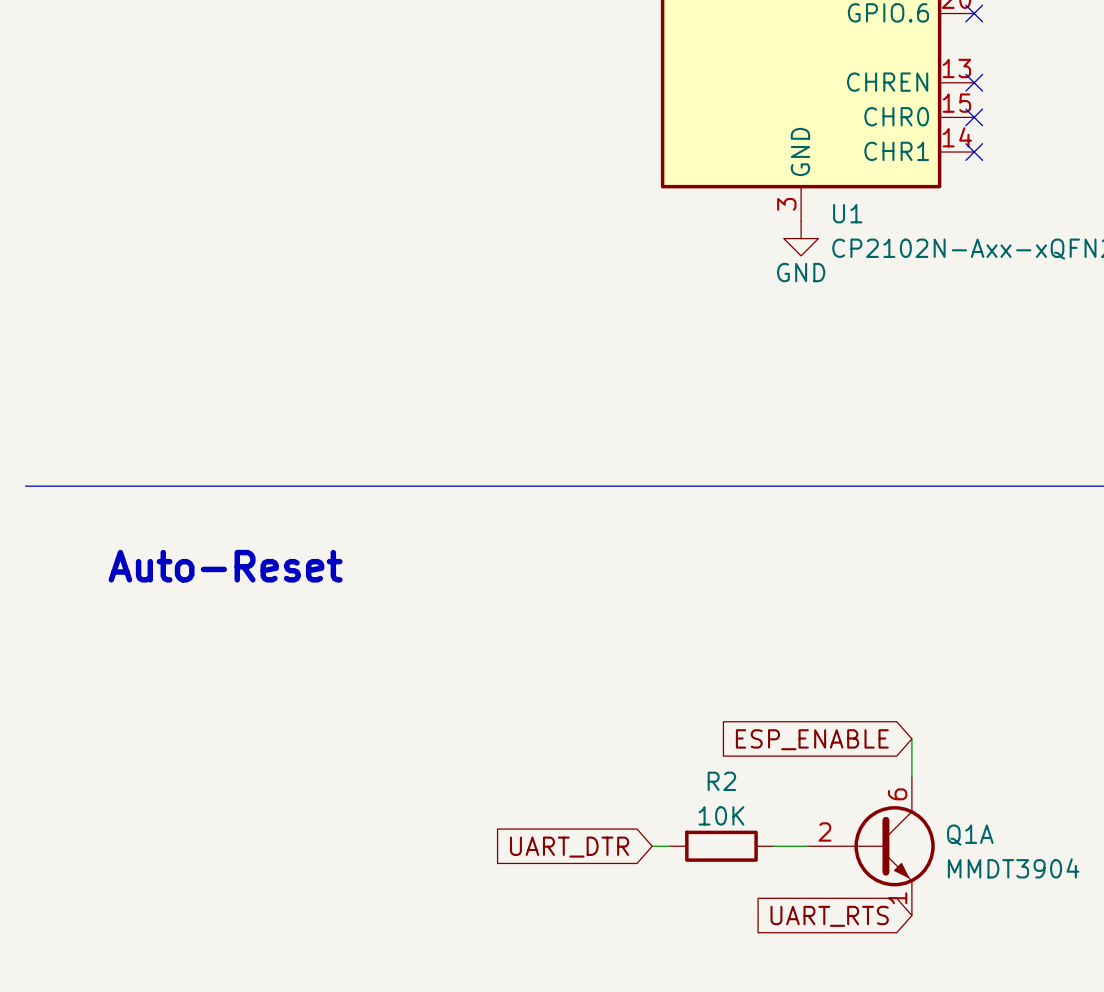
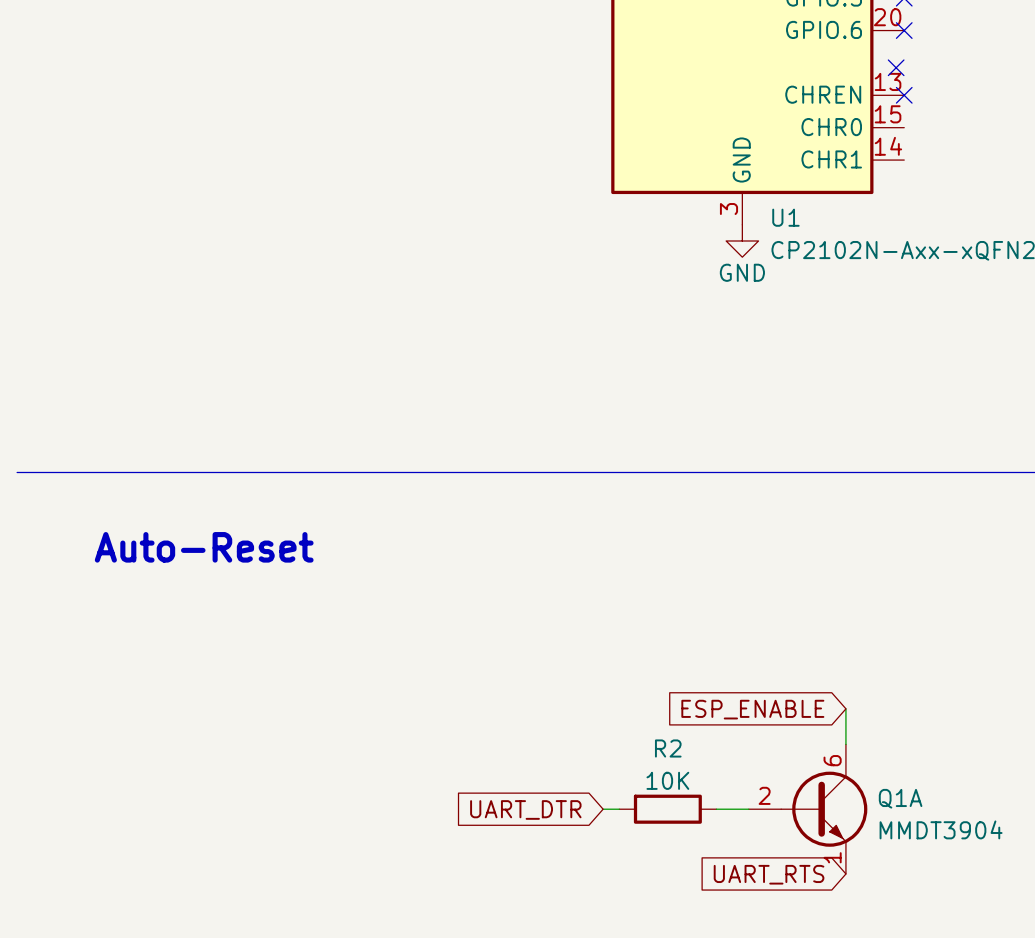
no-connect mark: none -> (896, 67)
no-connect mark: (974, 117) -> none
no-connect mark: (974, 152) -> none

